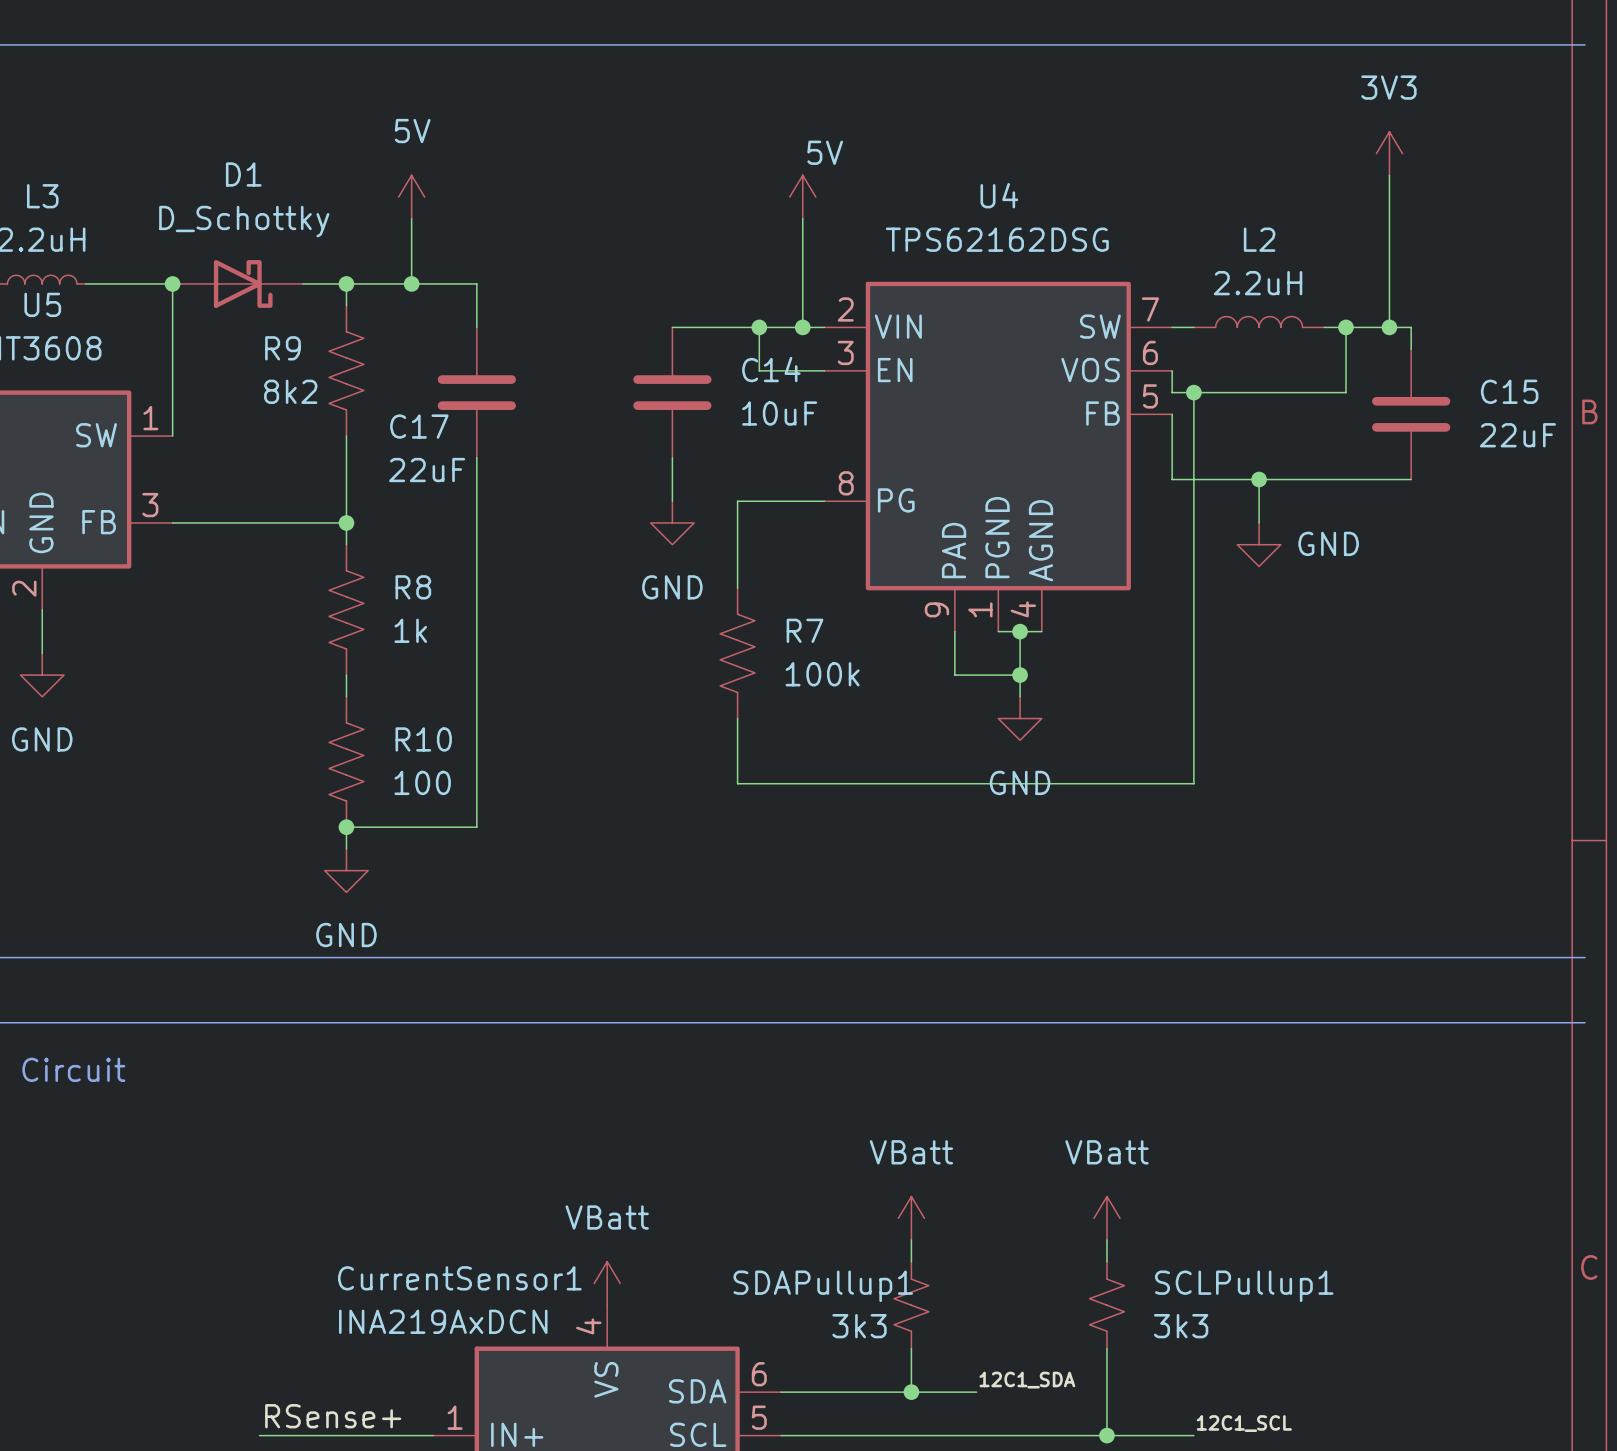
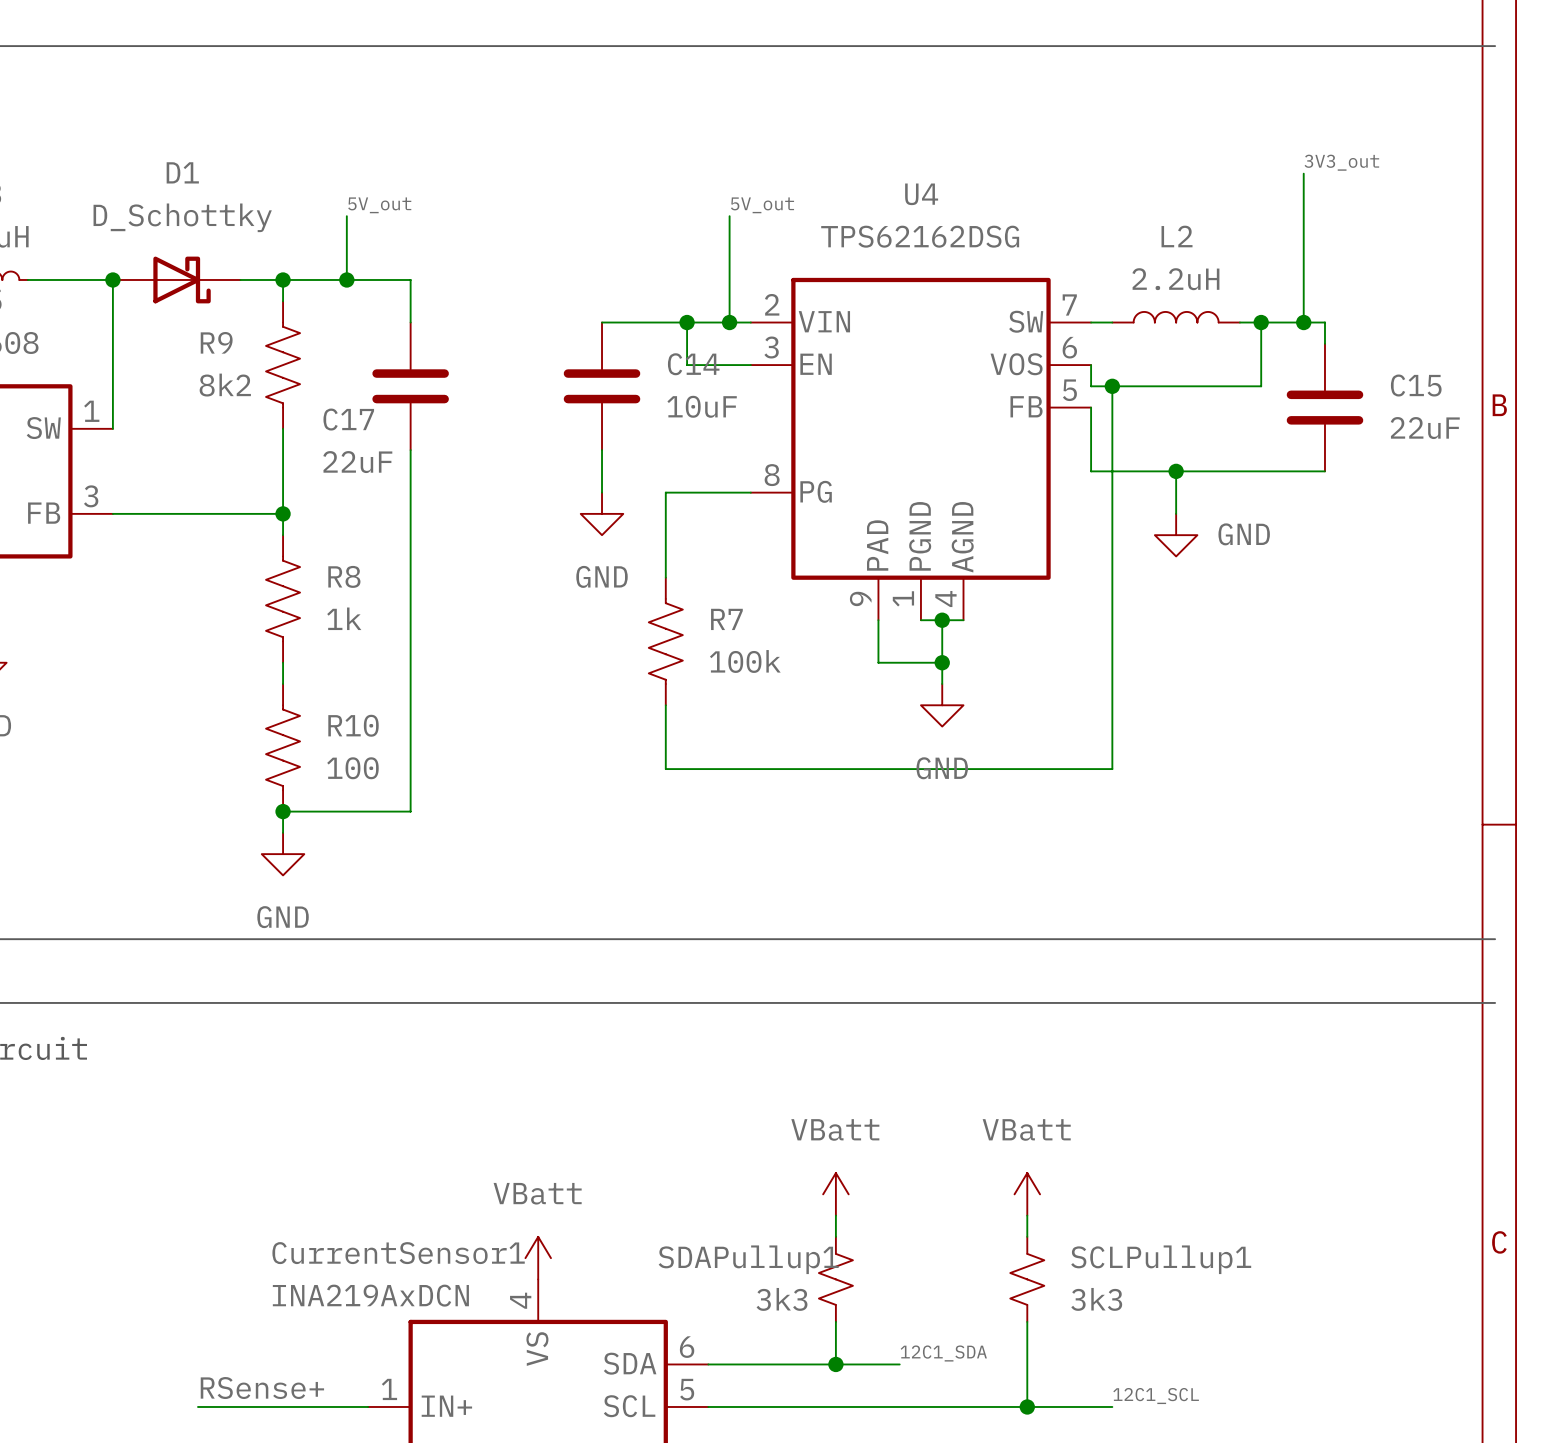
power symbol: 3V3 (1389, 153) -> none
label: none -> 3V3_out (1341, 162)
power symbol: 5V (411, 197) -> none
power symbol: 5V (802, 197) -> none
label: none -> 5V_out (379, 205)
label: none -> 5V_out (762, 205)

